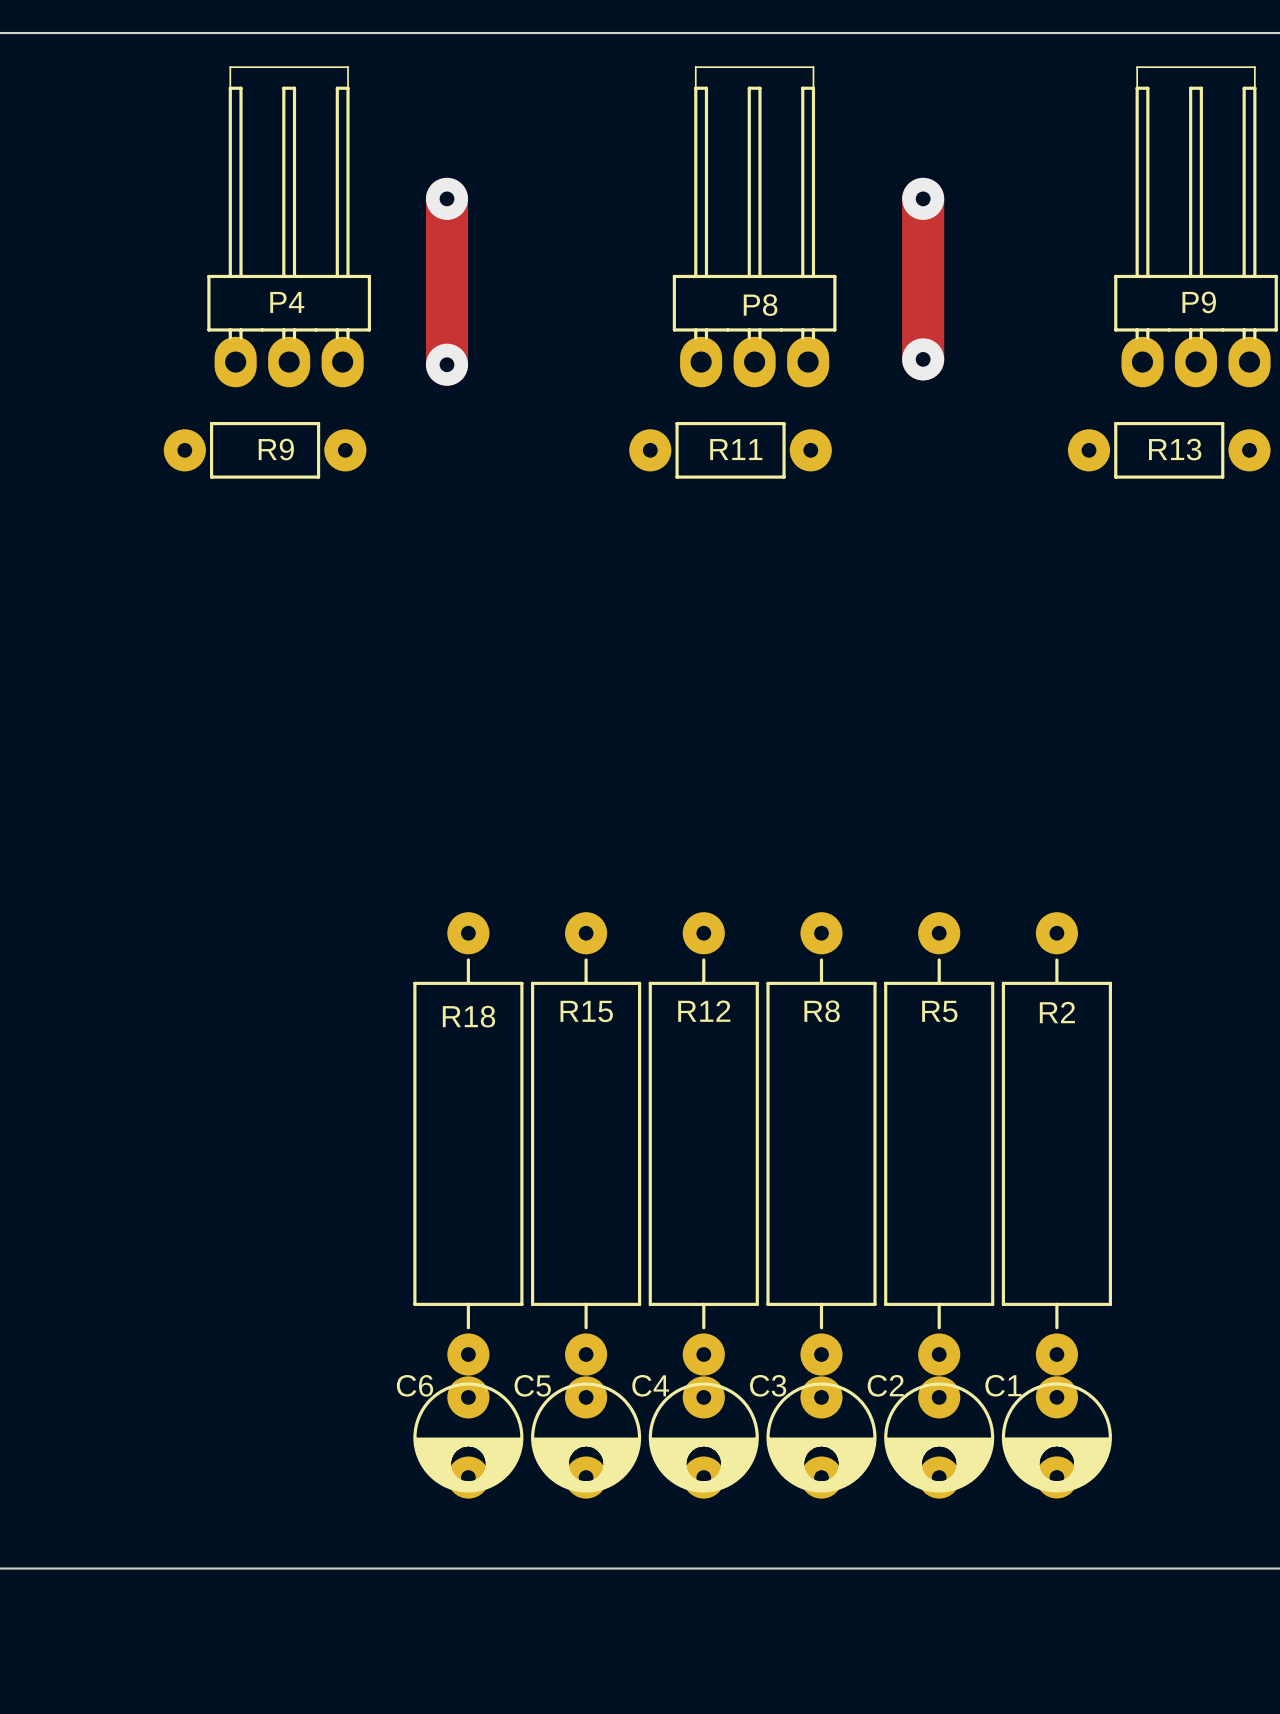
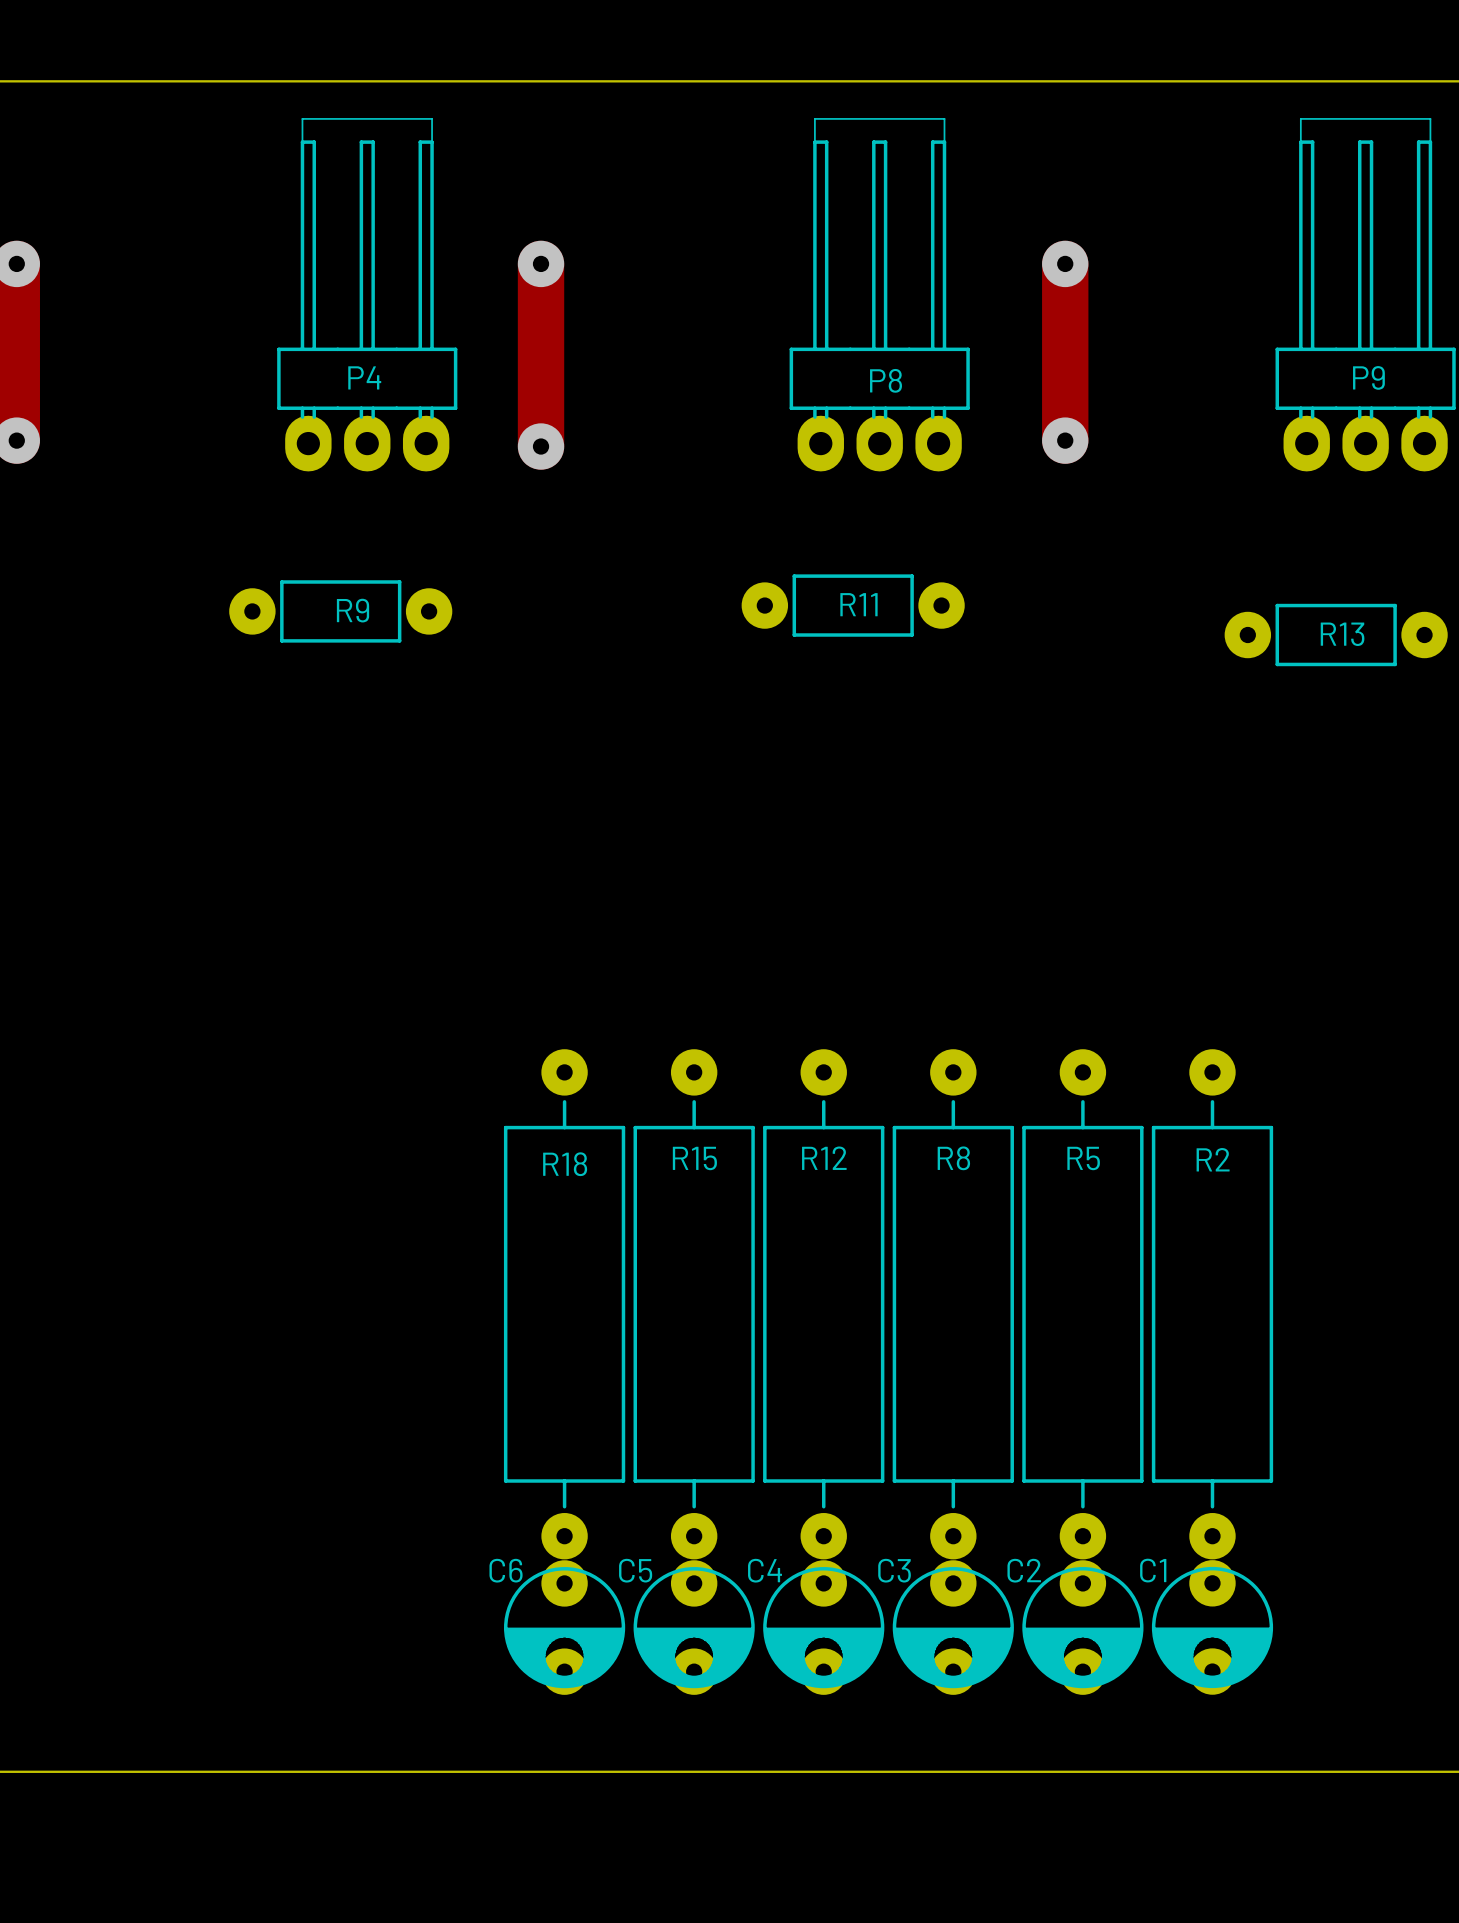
R9 position: (265, 450) -> (340, 611)
R11 position: (730, 450) -> (853, 605)
R13 position: (1169, 450) -> (1336, 635)

